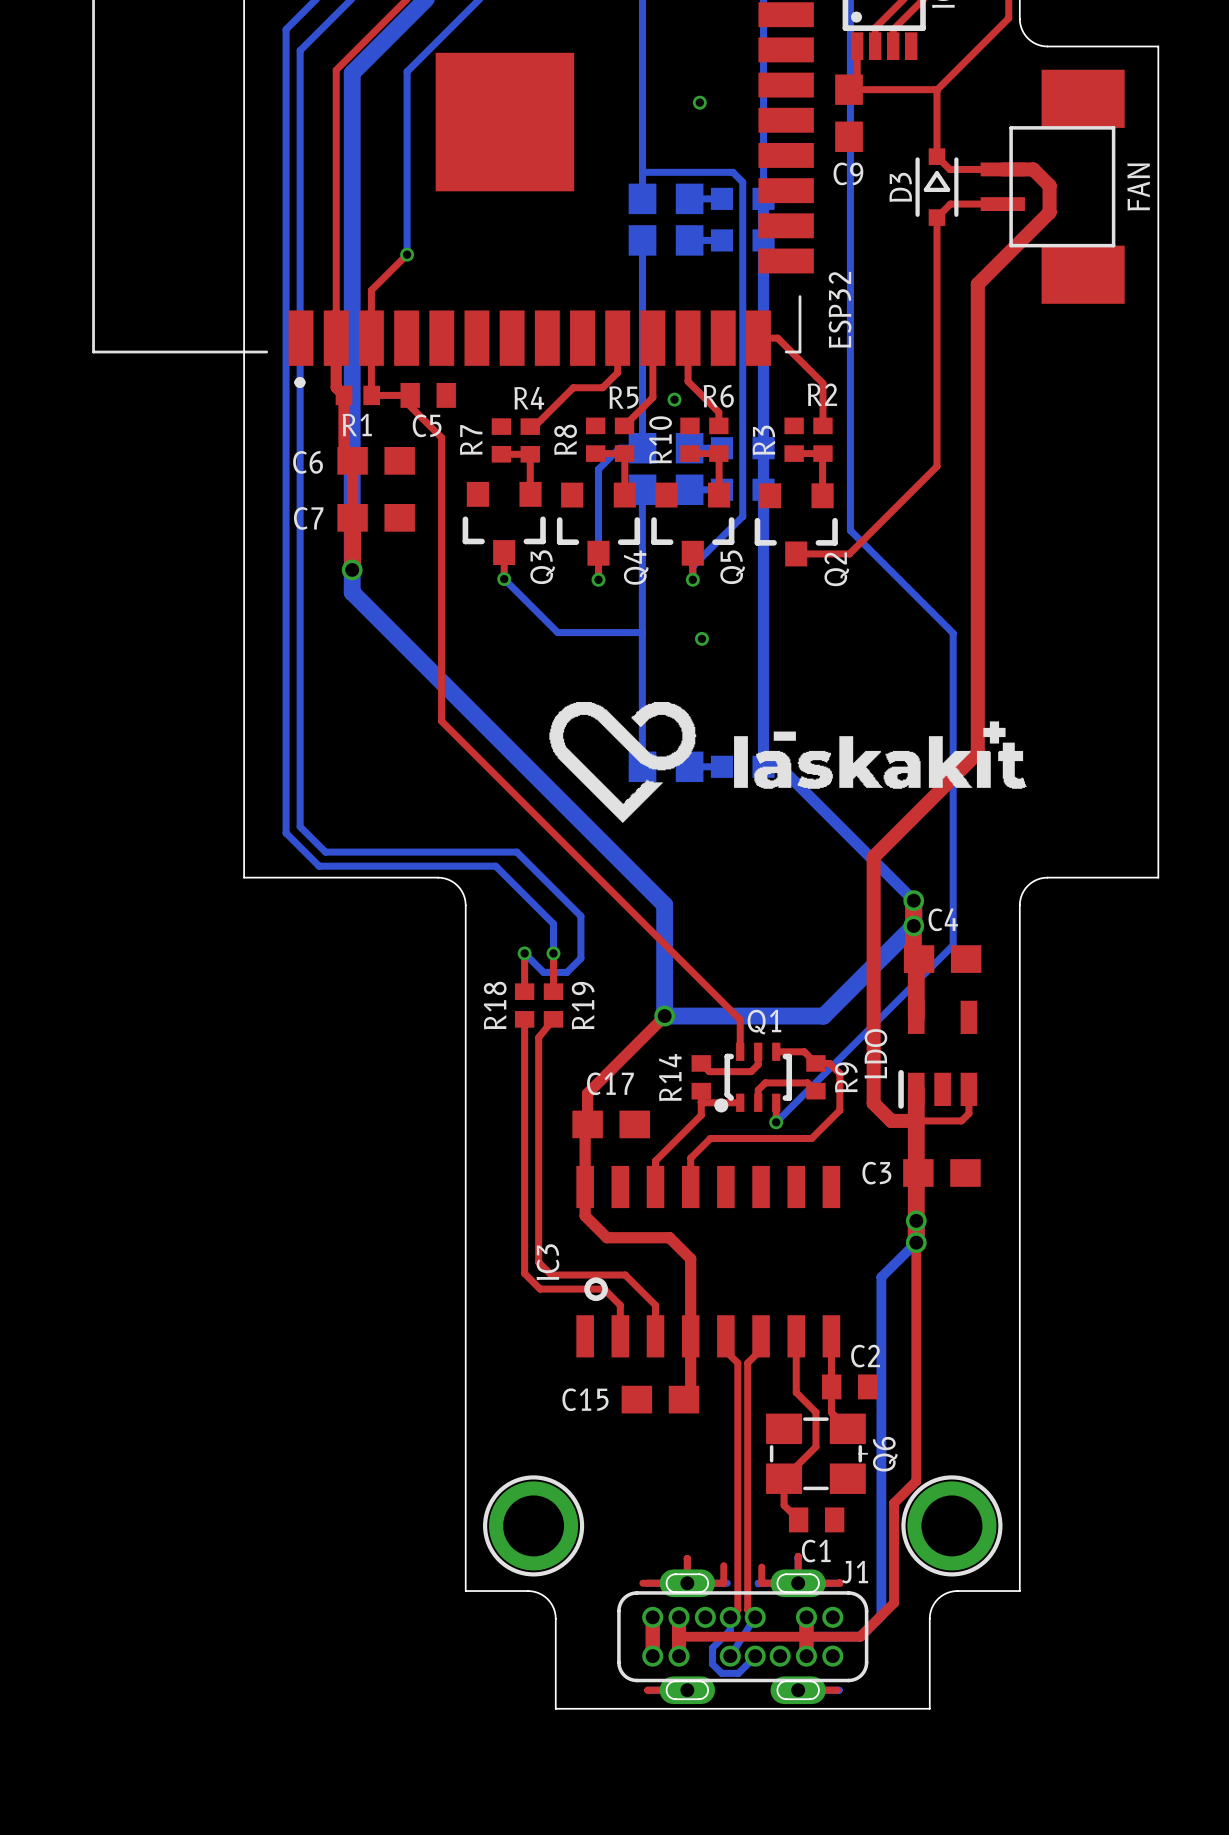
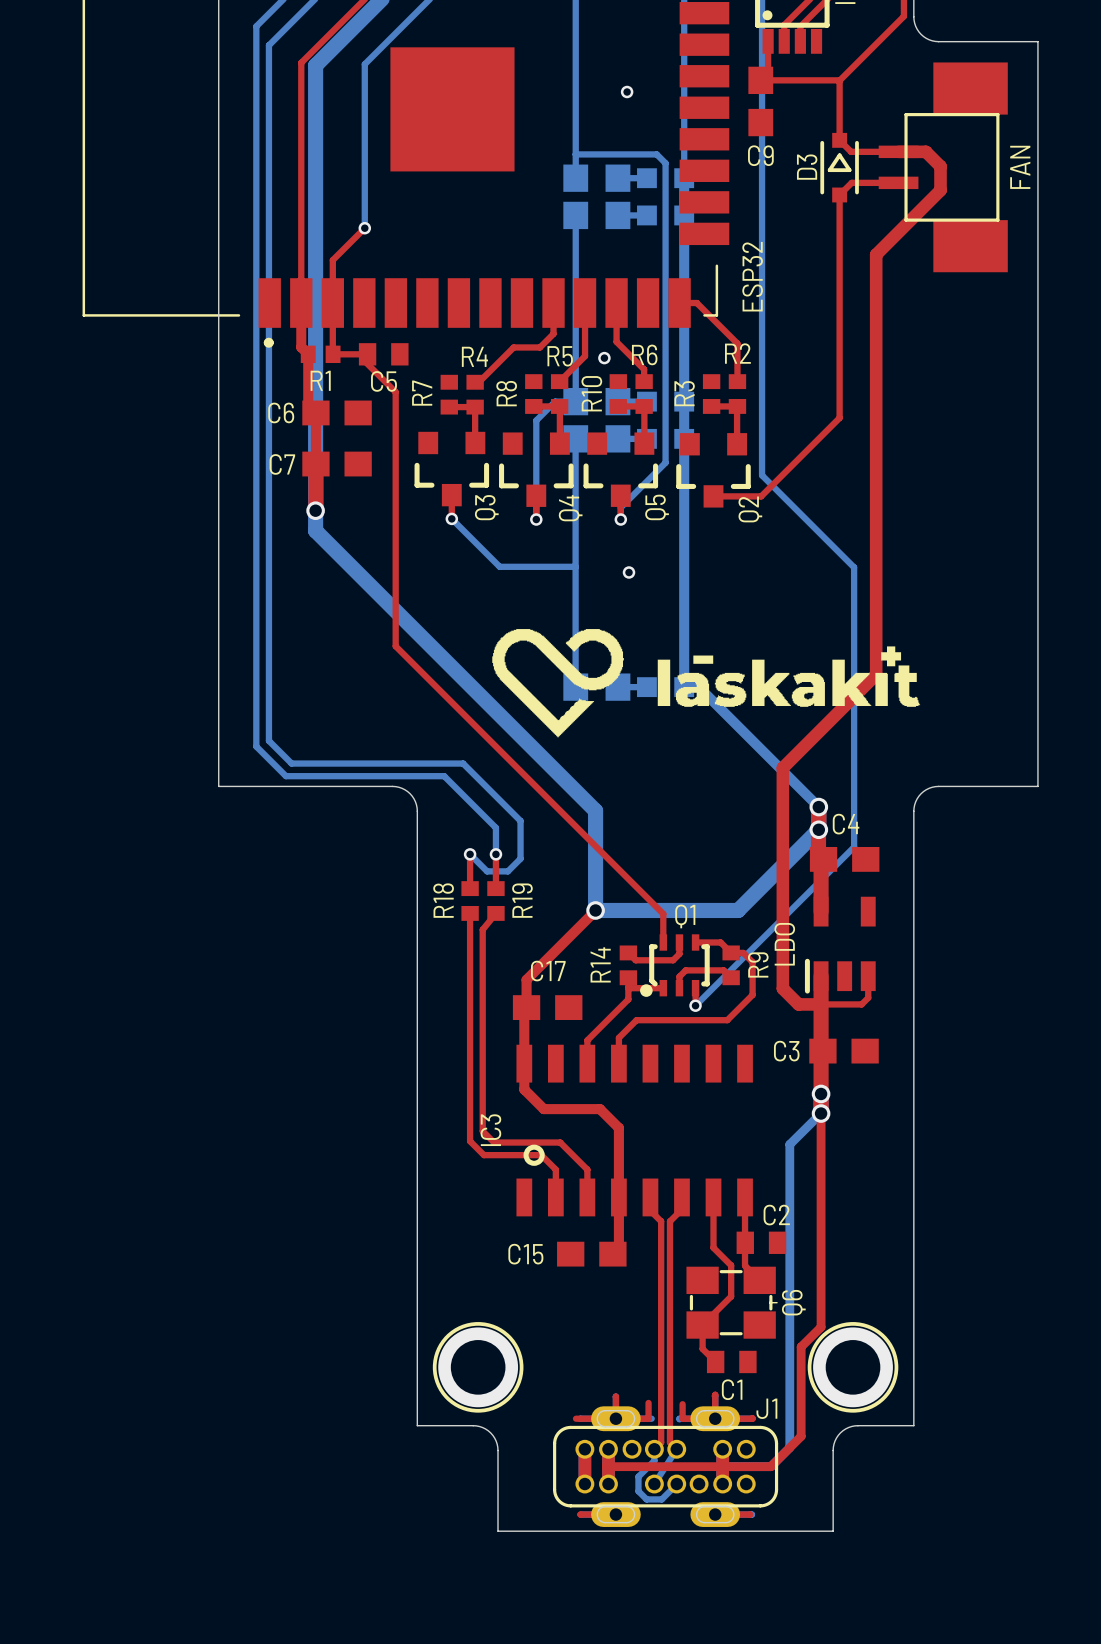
C6 name: C6 (308, 462) -> C7 (282, 464)
C7 name: C7 (308, 518) -> C6 (281, 412)

